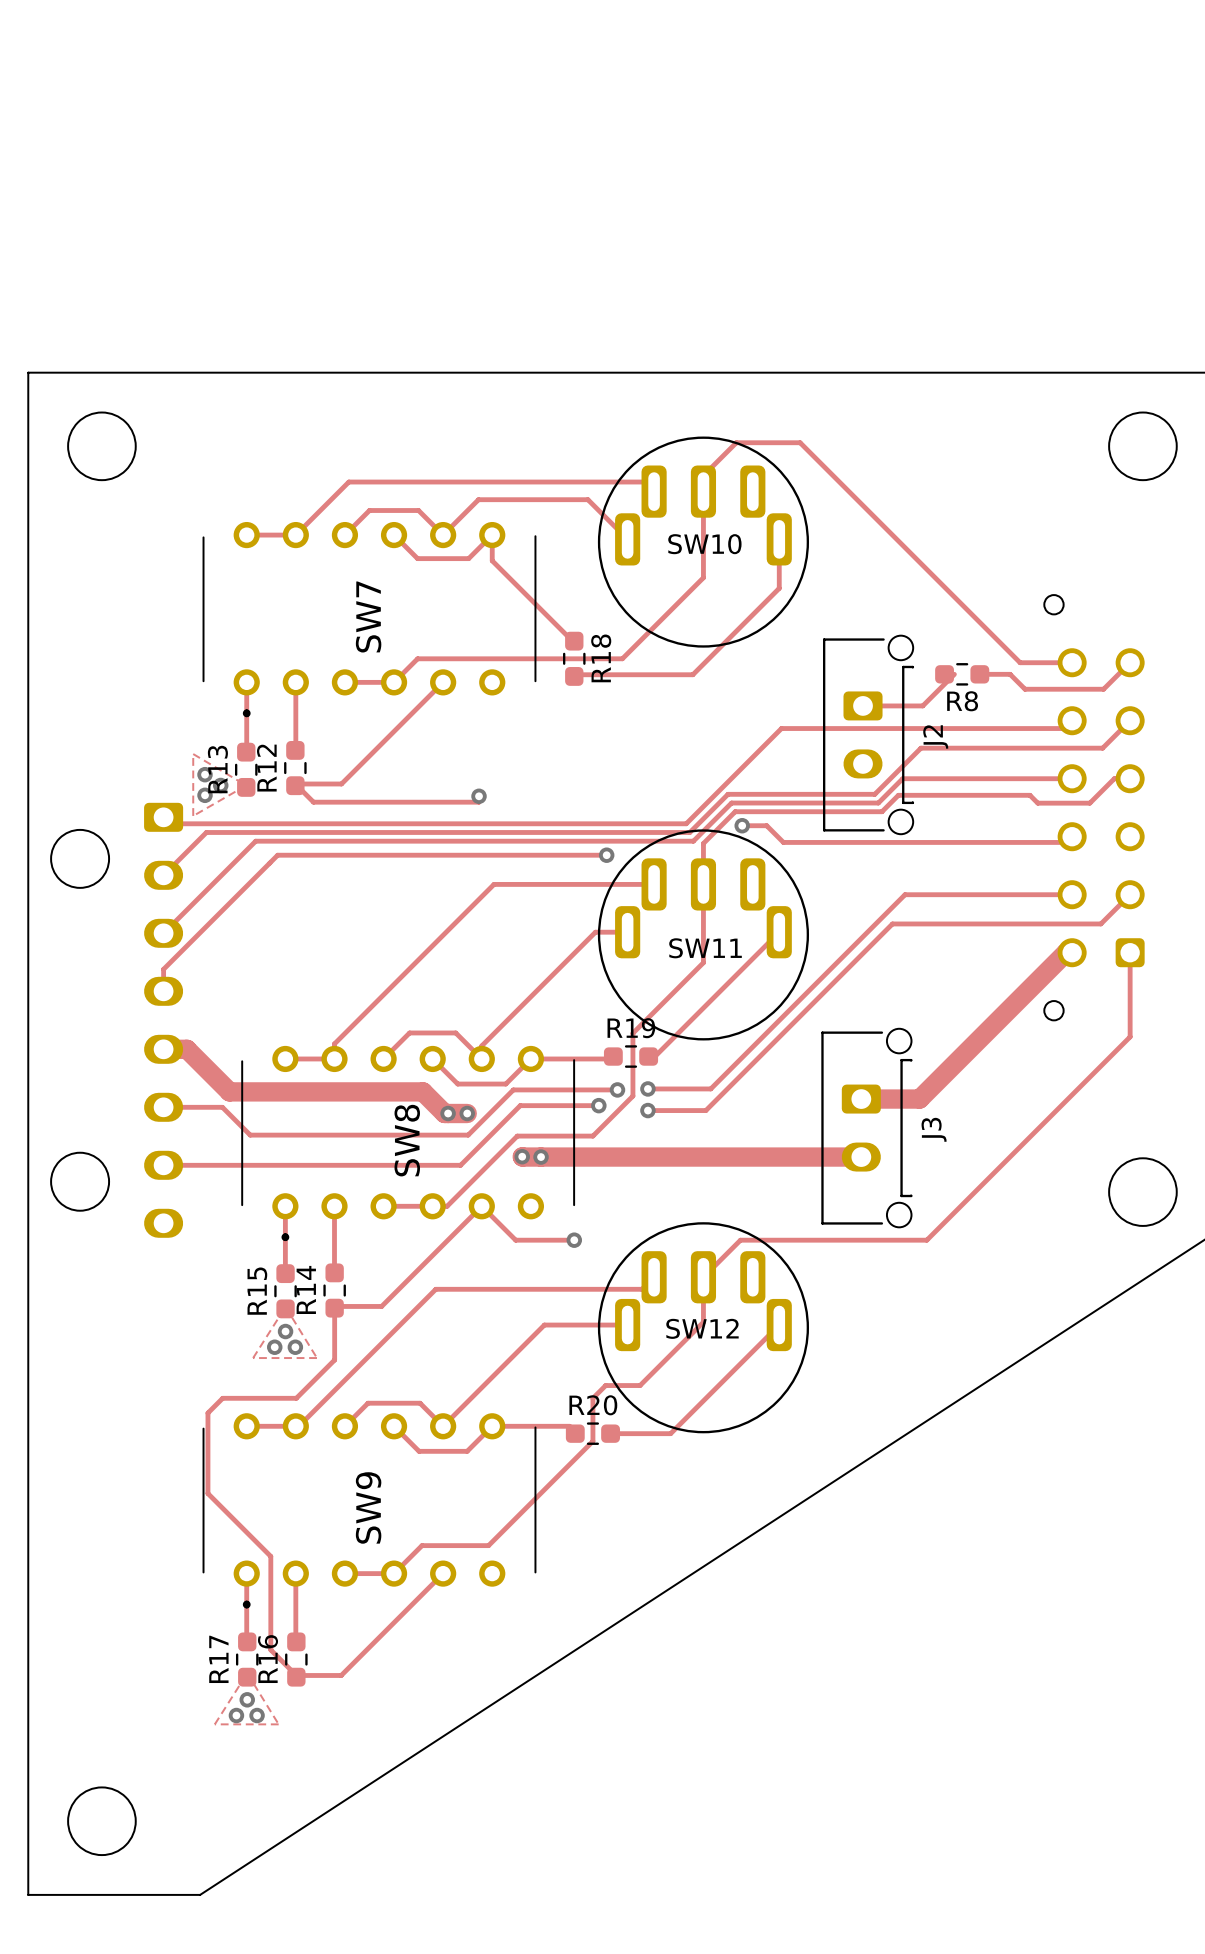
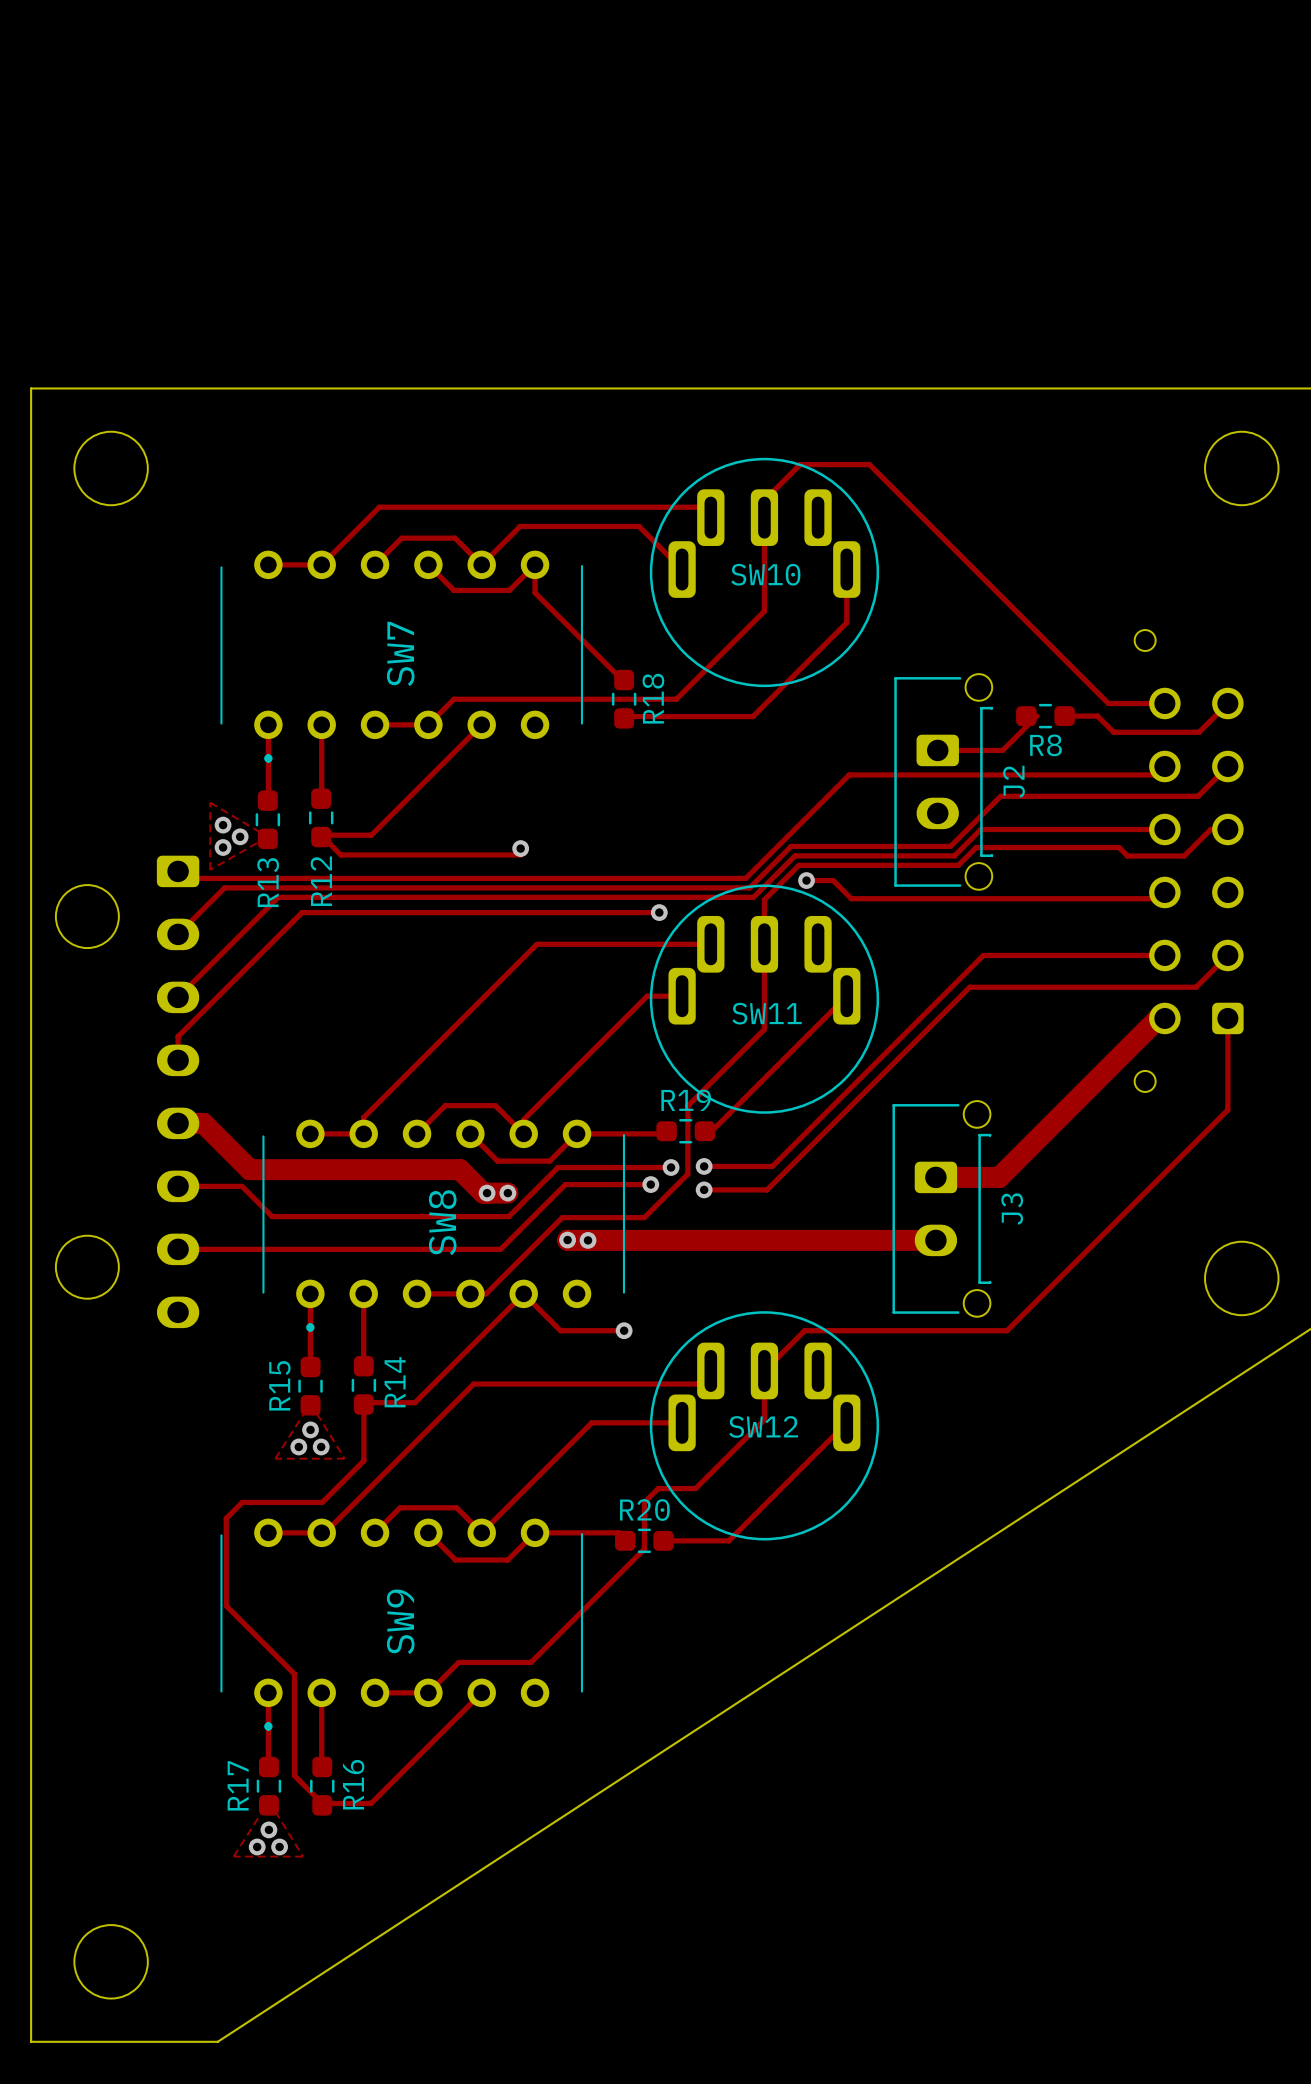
R12 name position: R12 (266, 768) -> R12 (321, 881)
R13 name position: R13 (217, 769) -> R13 (268, 882)
R14 name position: R14 (306, 1289) -> R14 (395, 1382)
R16 name position: R16 (267, 1659) -> R16 (353, 1784)

